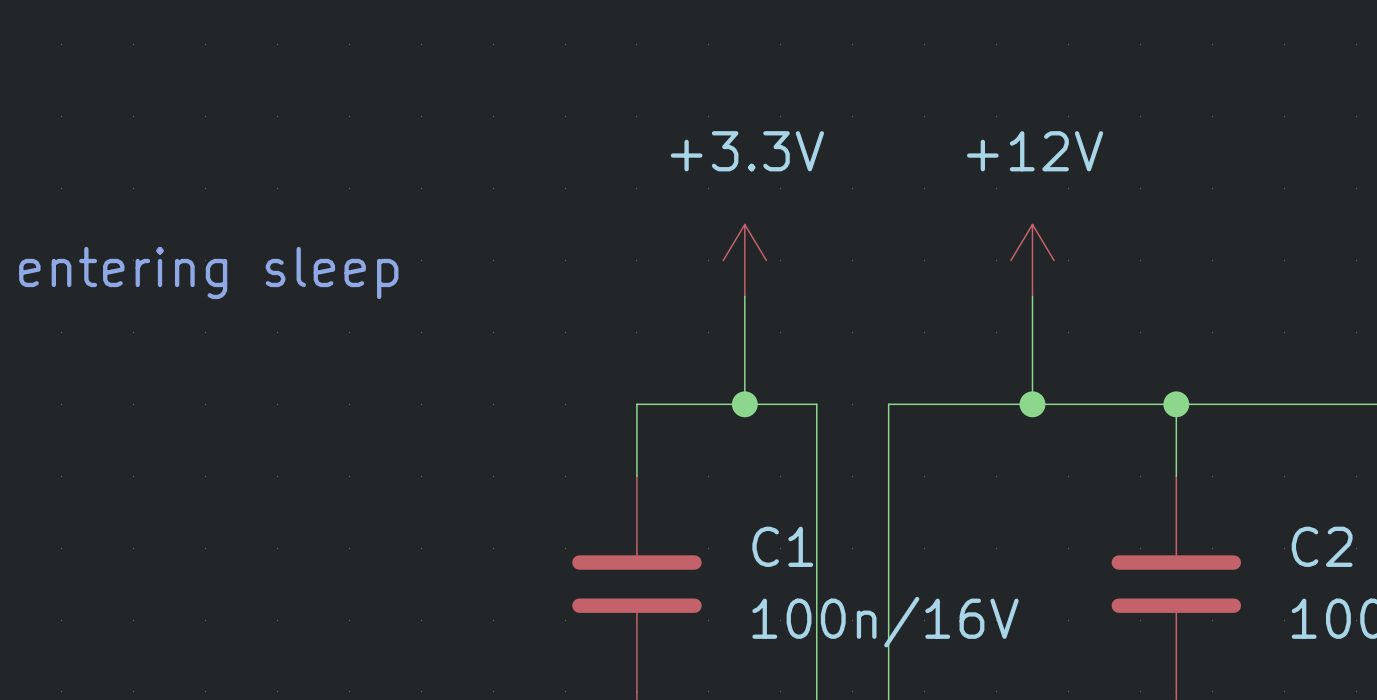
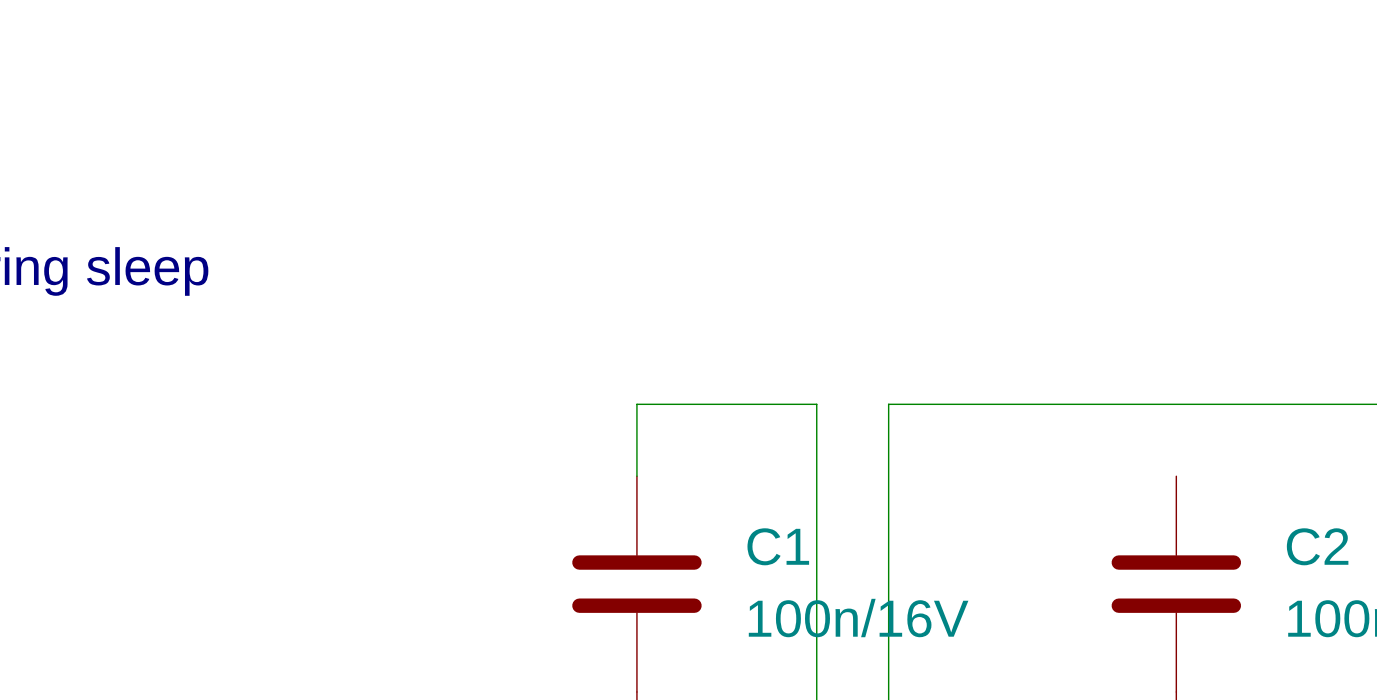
power symbol: +3.3V (744, 260) -> none
power symbol: +12V (1032, 260) -> none
wire: (744, 296) (744, 404) -> none
wire: (1032, 296) (1032, 404) -> none
junction: (744, 404) -> none
junction: (1032, 404) -> none
wire: (1176, 404) (1176, 476) -> none
junction: (1176, 404) -> none

